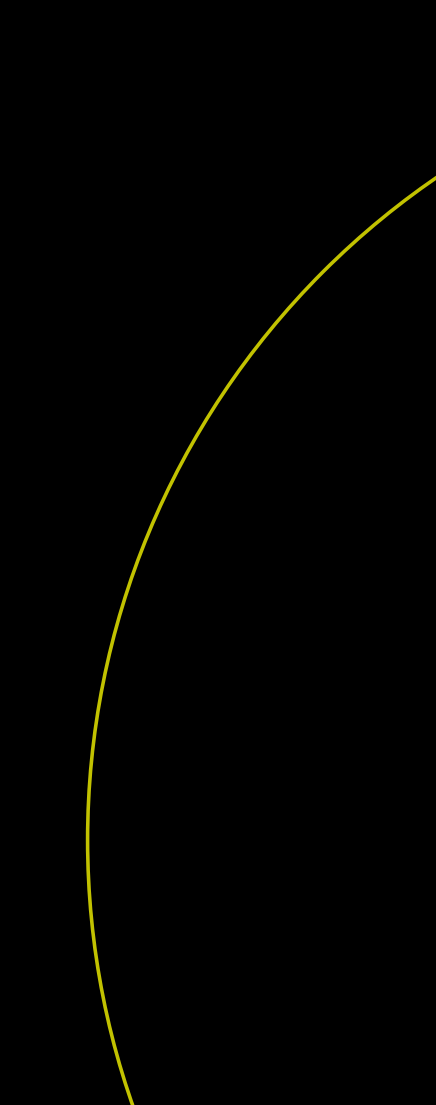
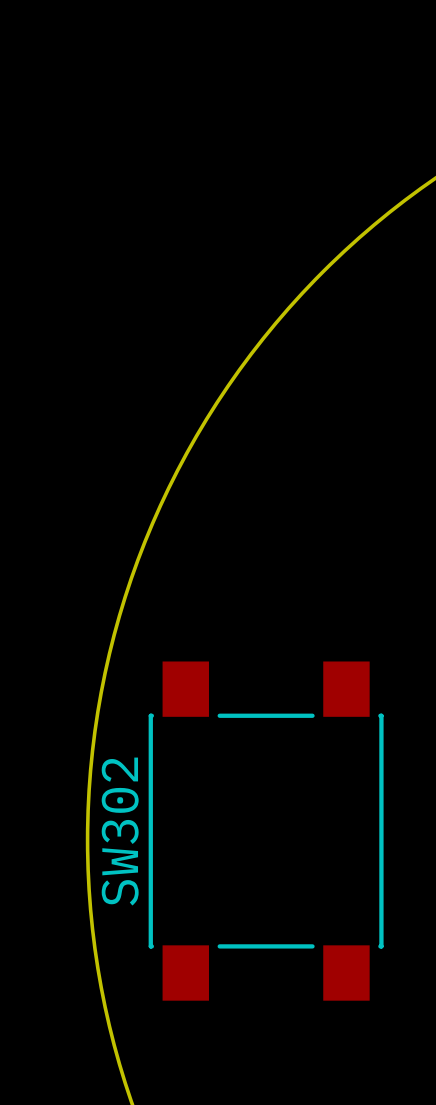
SW302: none -> (266, 831)

